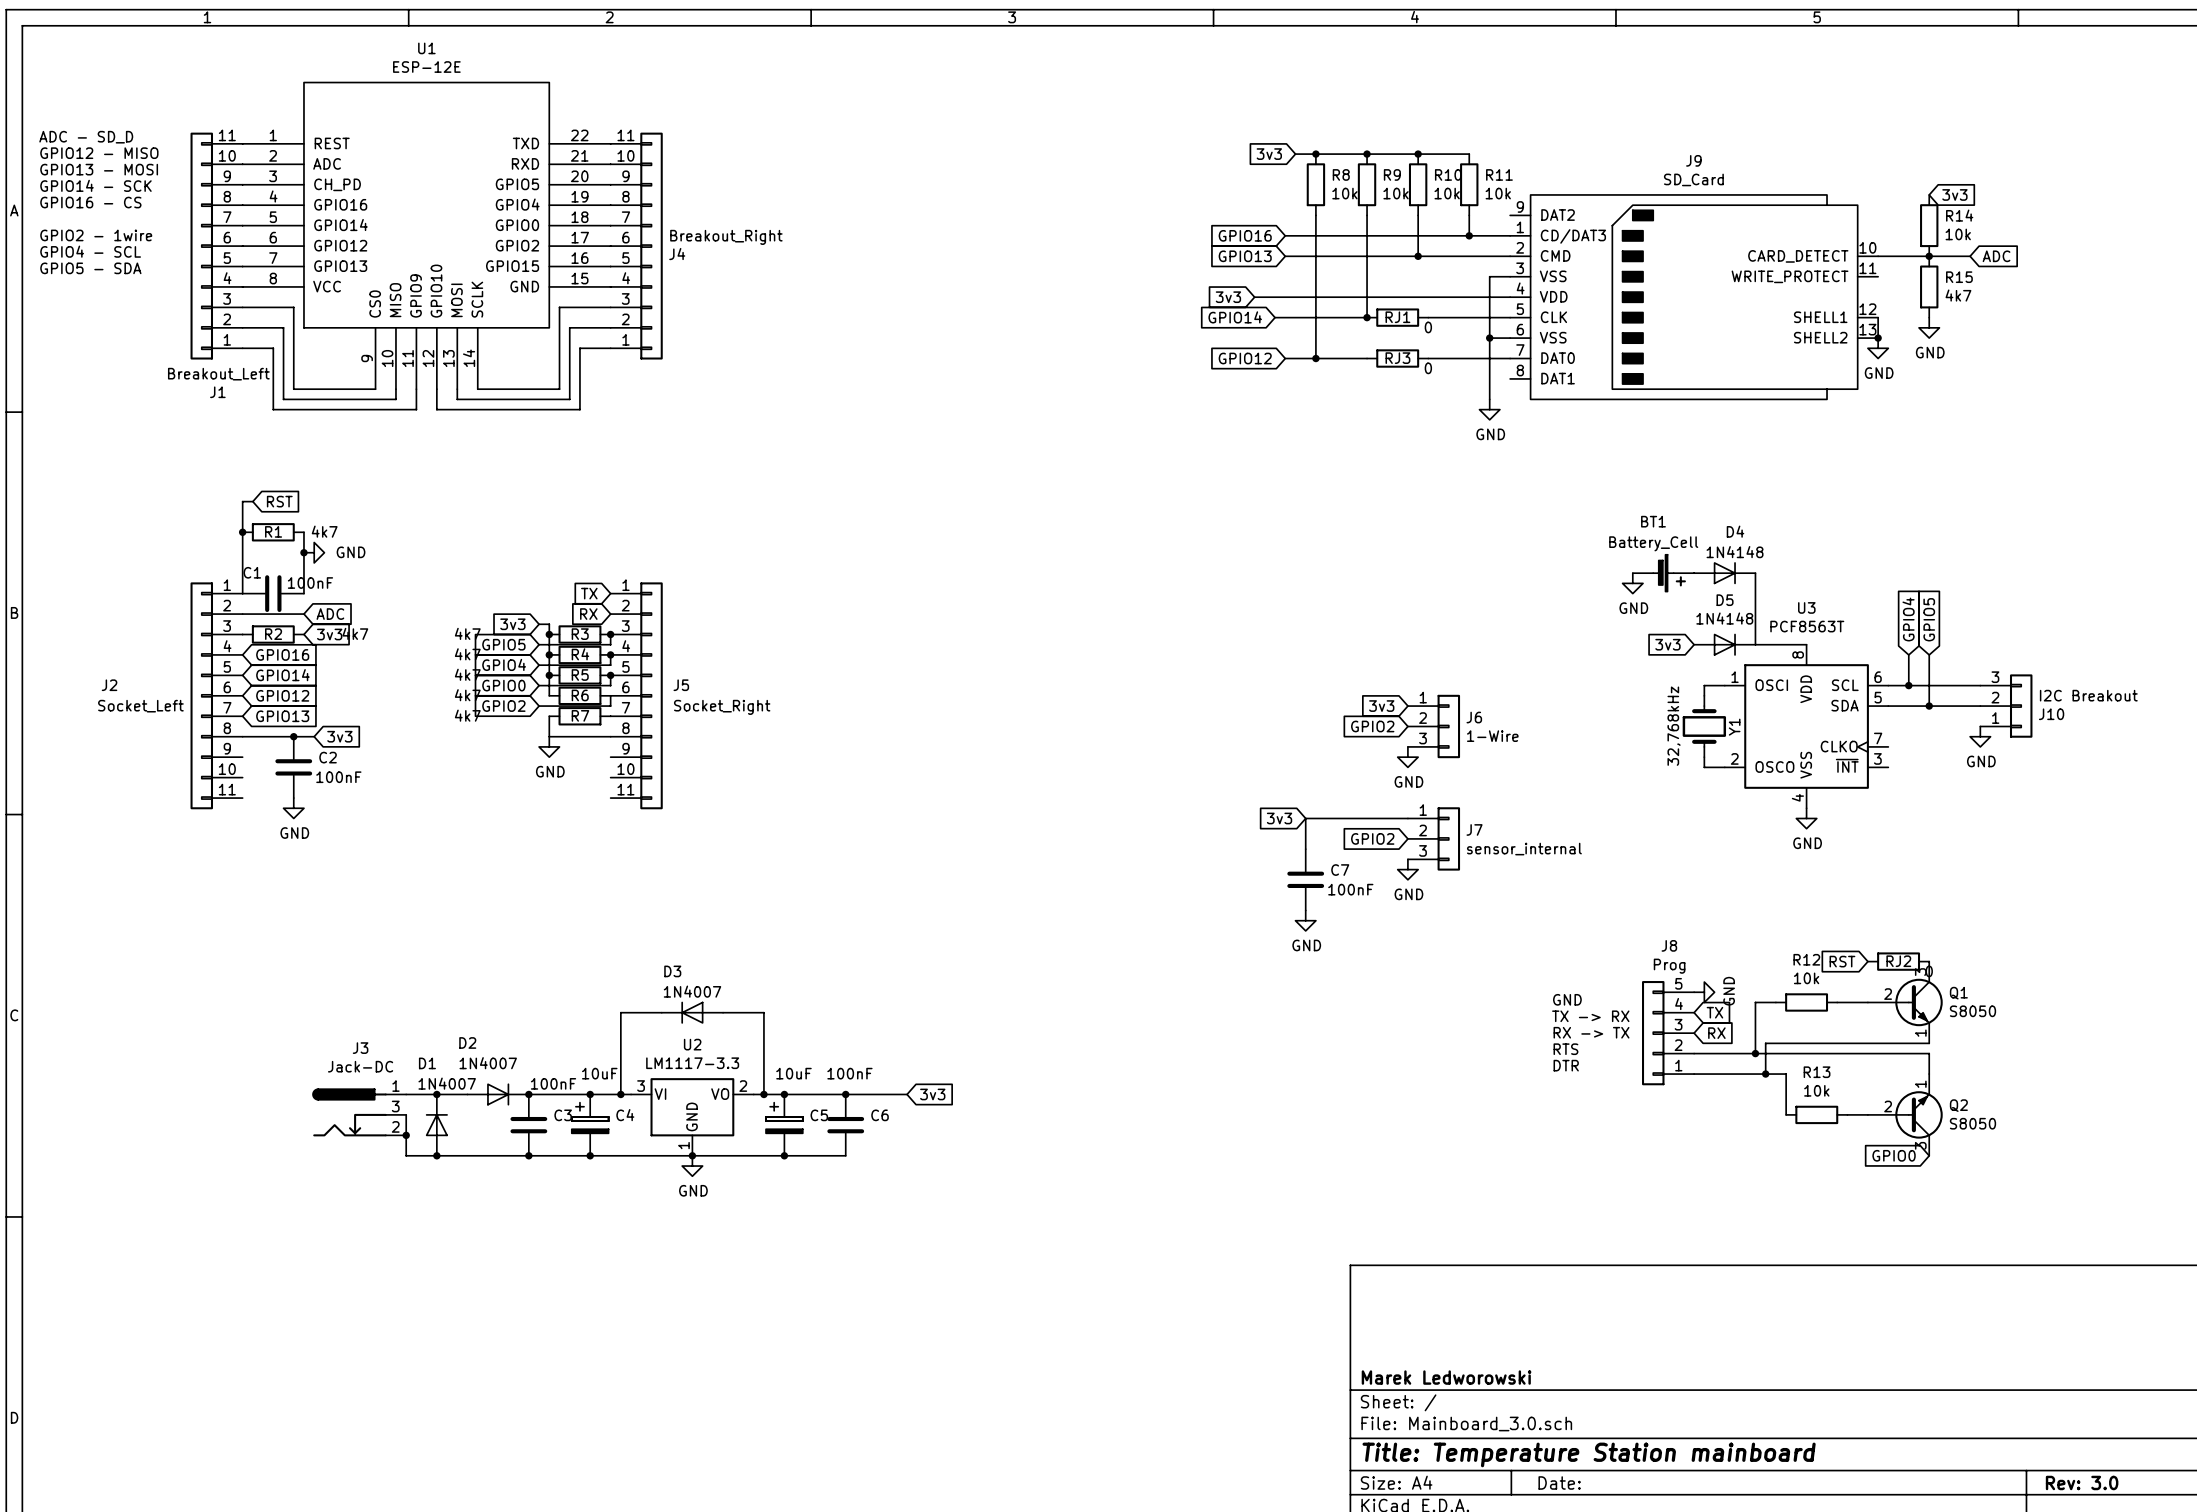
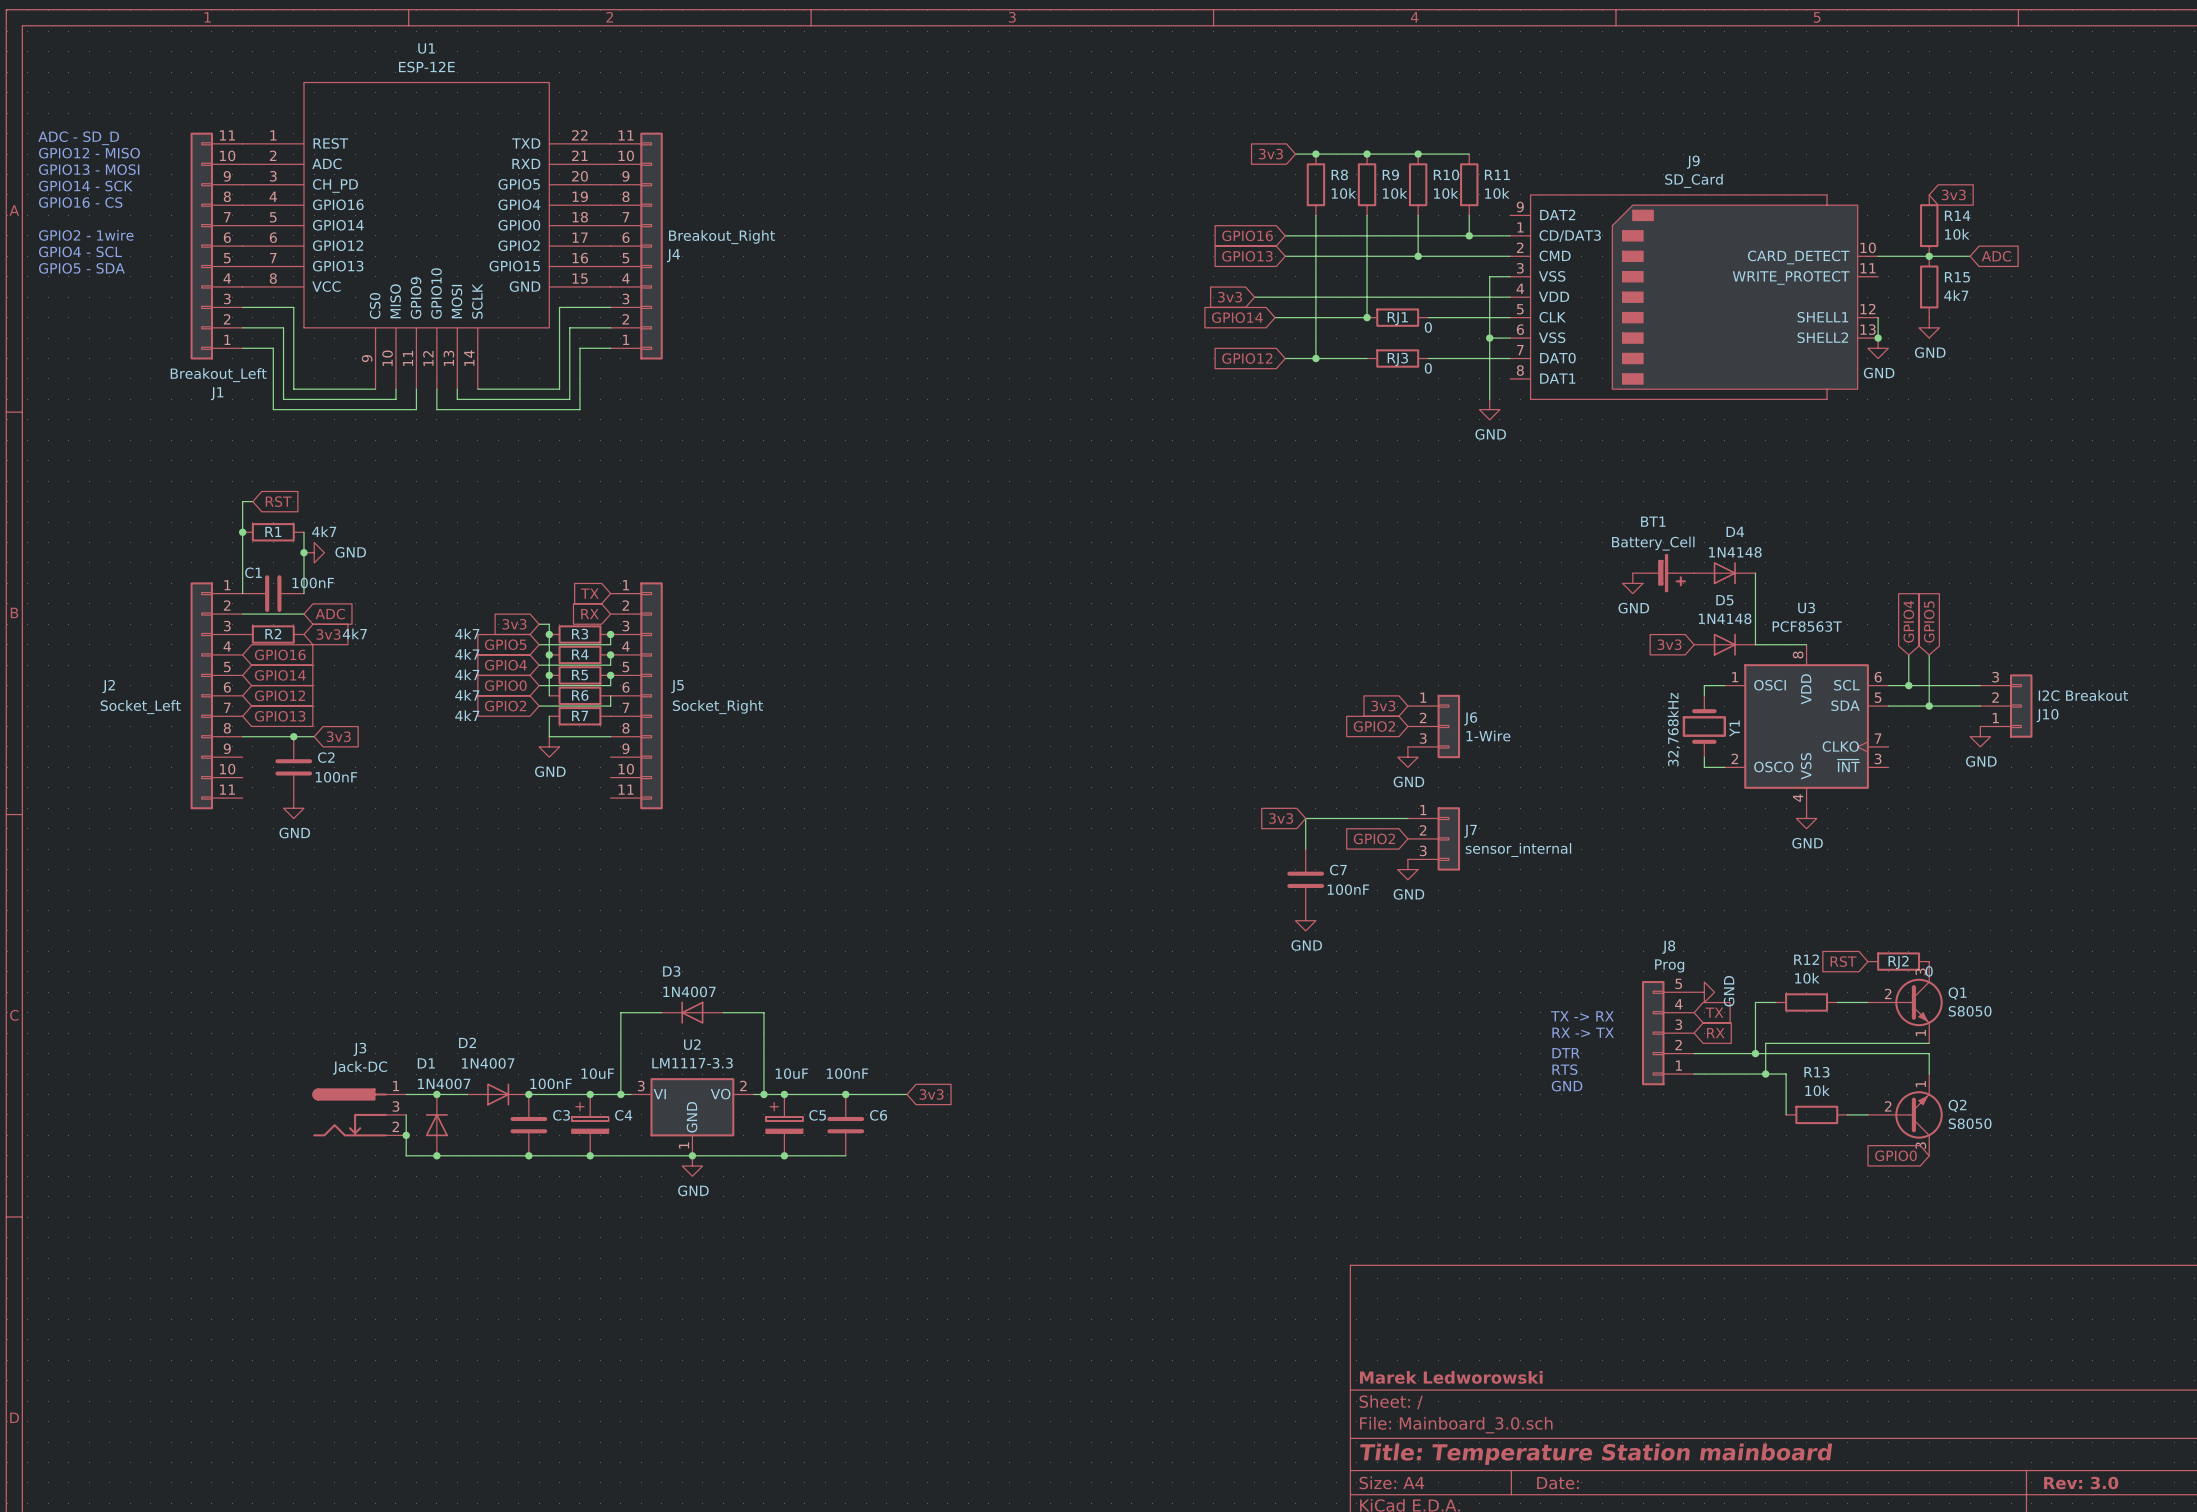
text position: GND (1567, 999) -> GND (1567, 1086)
text: RTS (1565, 1049) -> DTR (1566, 1053)
text: DTR (1566, 1065) -> RTS (1564, 1069)

